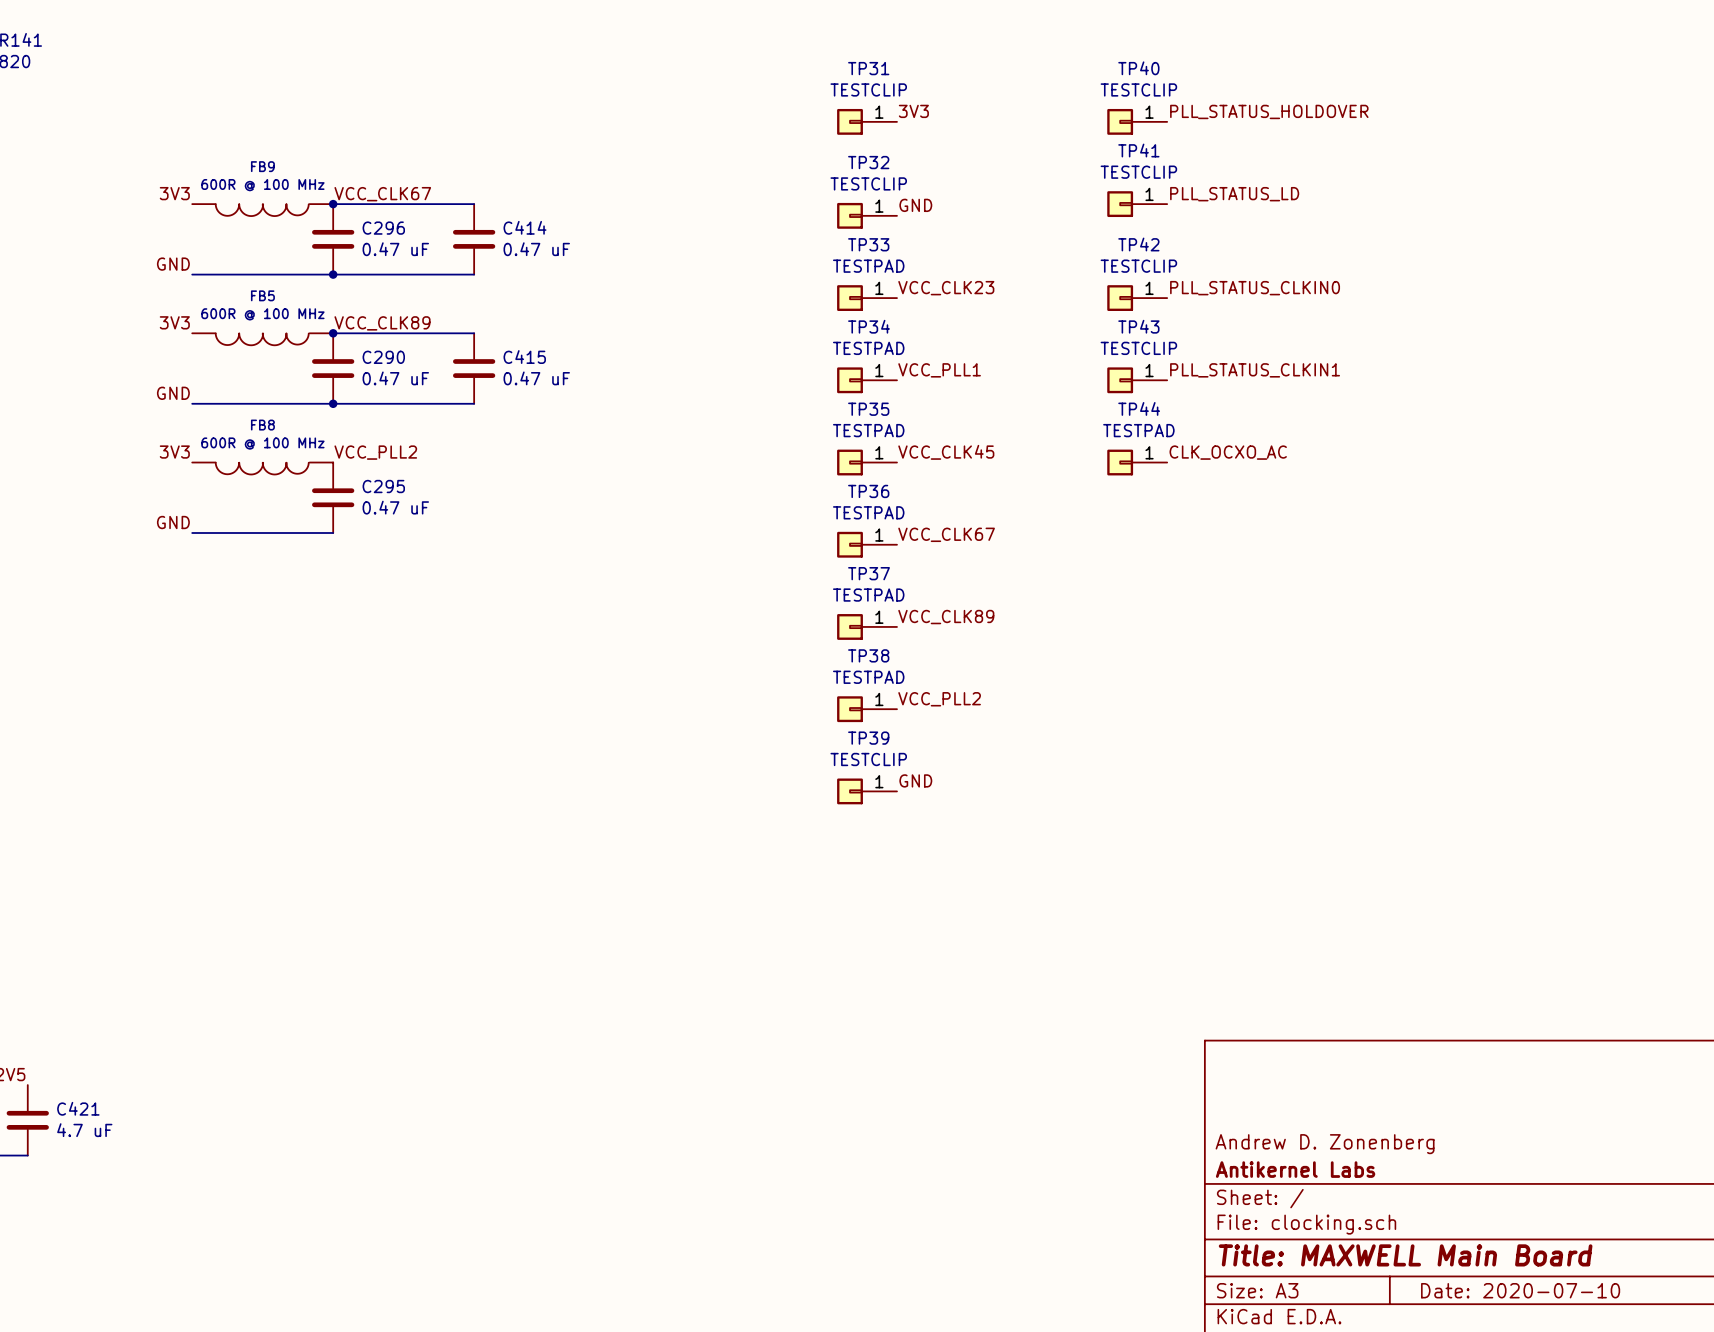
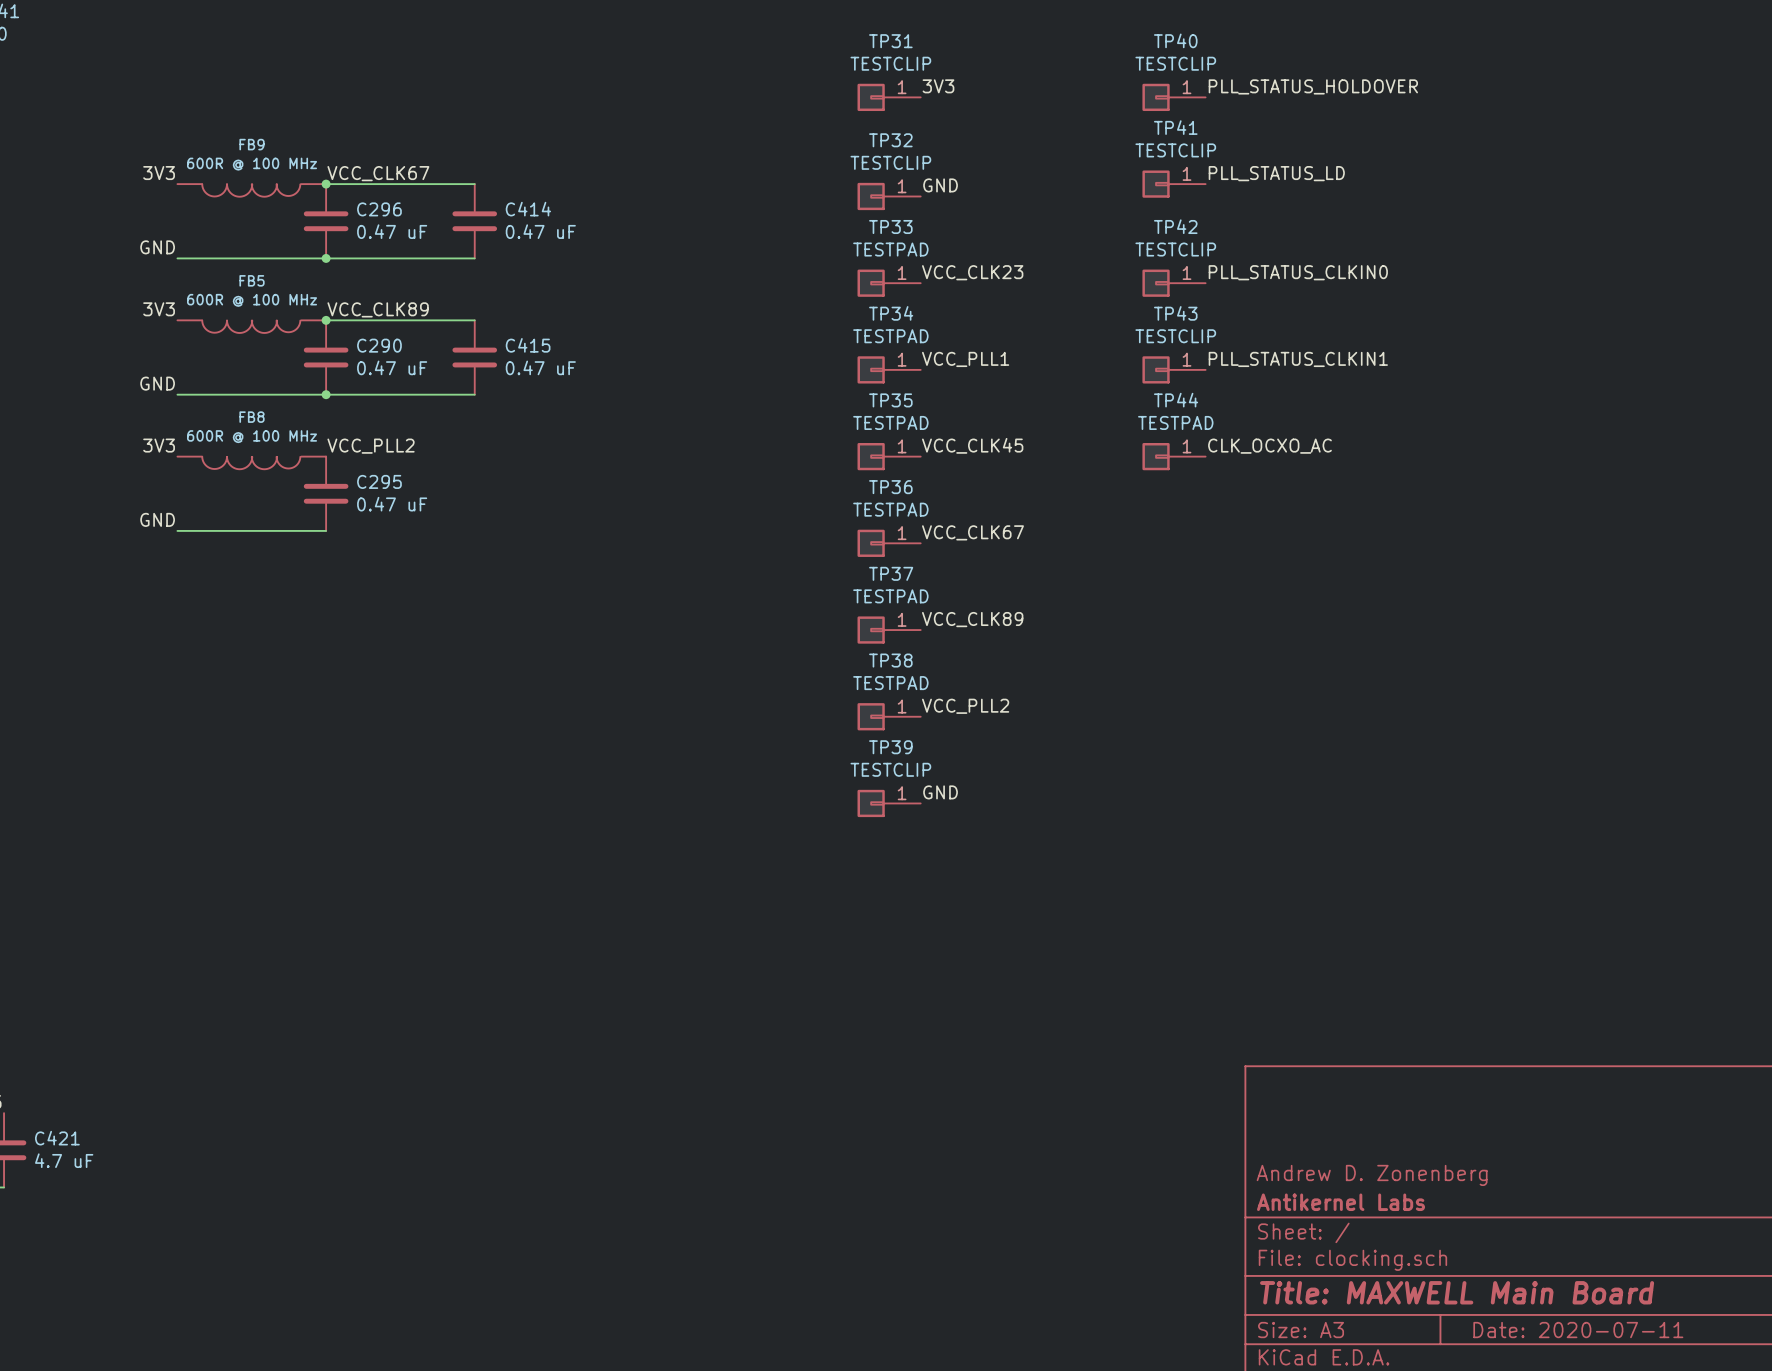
title block: Date: 2020-07-10 (1520, 1290) -> Date: 2020-07-11 (1578, 1330)

